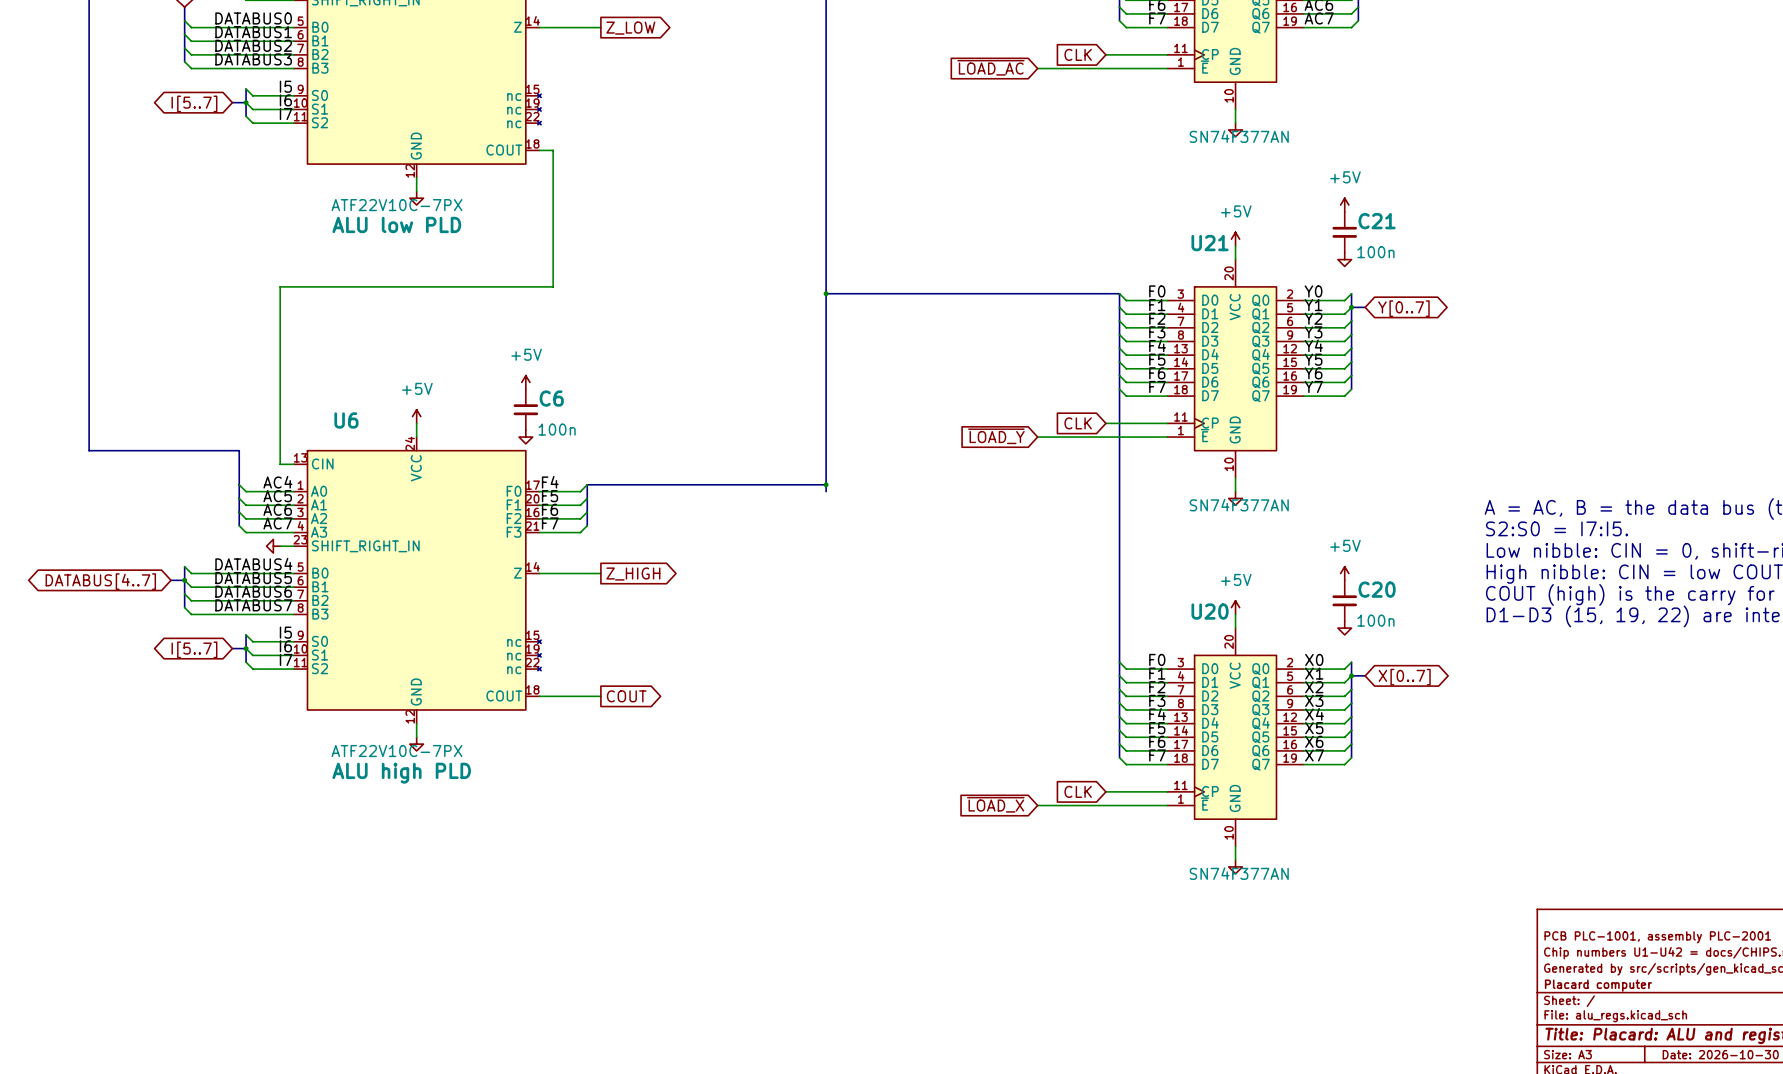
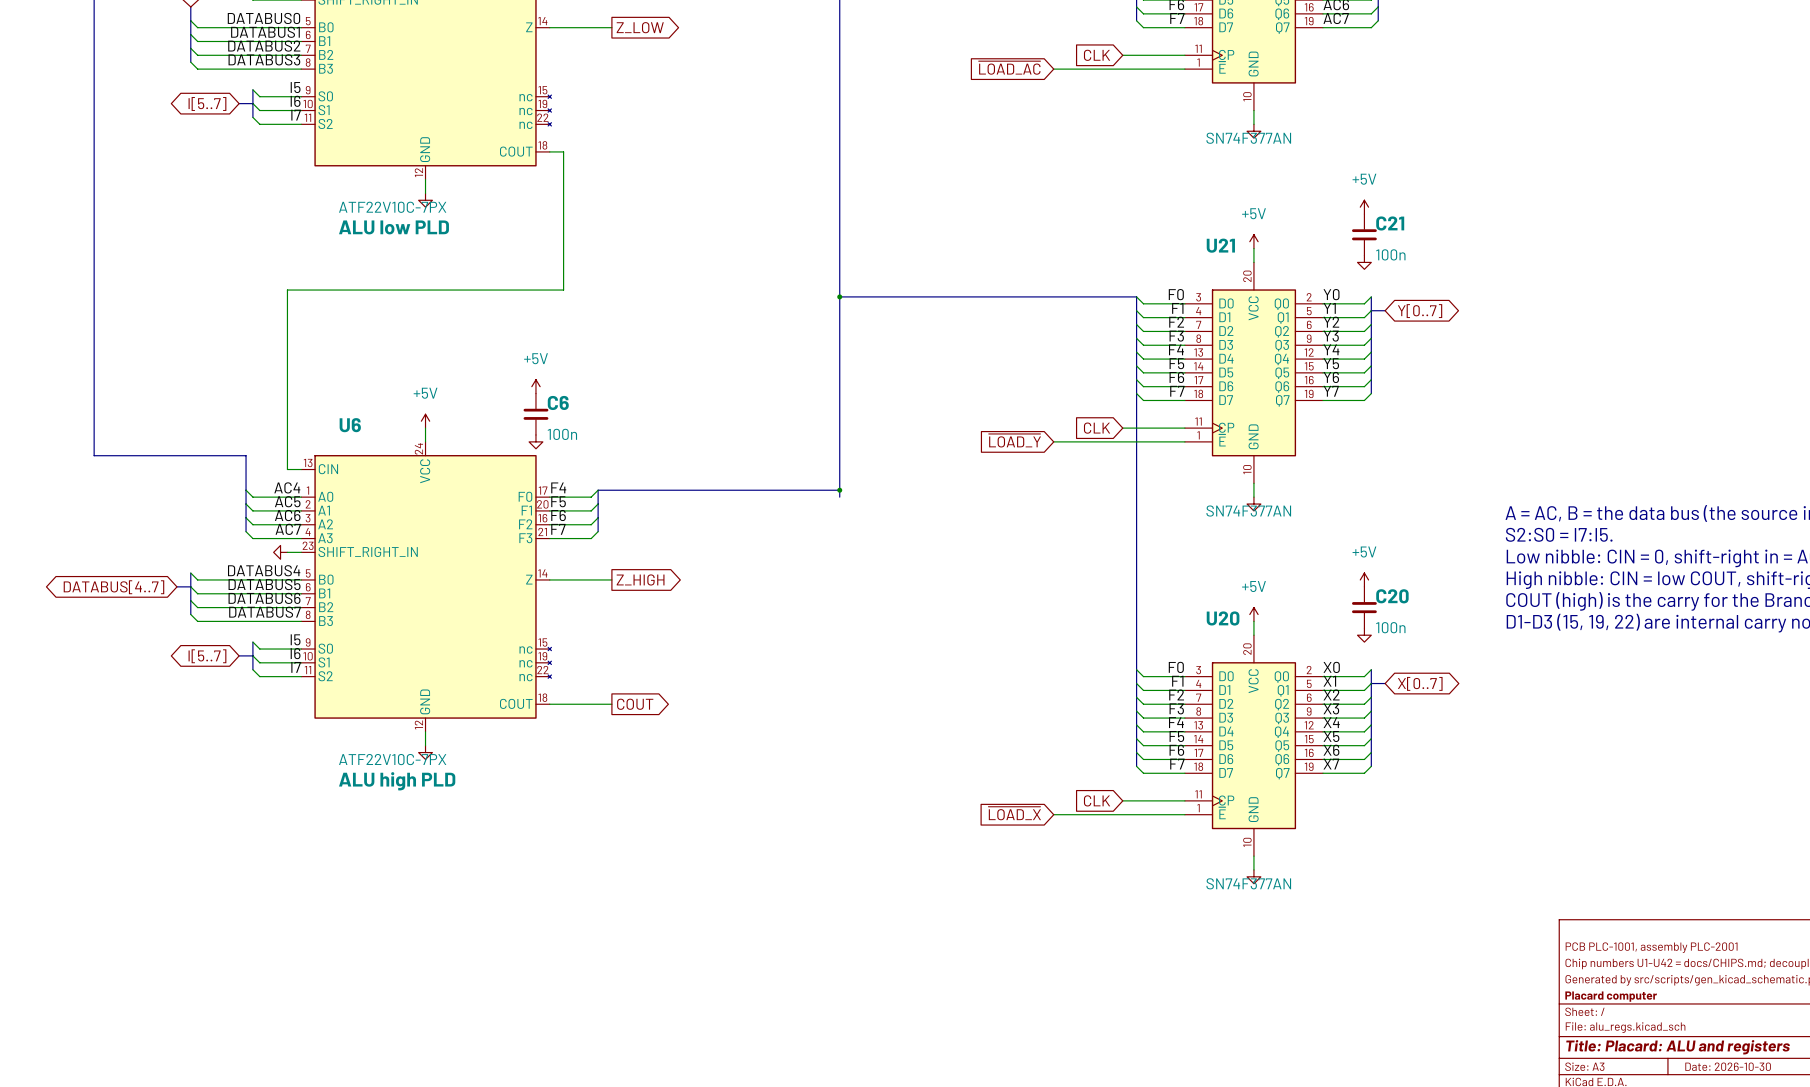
junction: (246, 102) -> none
junction: (1351, 307) -> none
junction: (184, 580) -> none
junction: (246, 648) -> none
junction: (1351, 675) -> none

